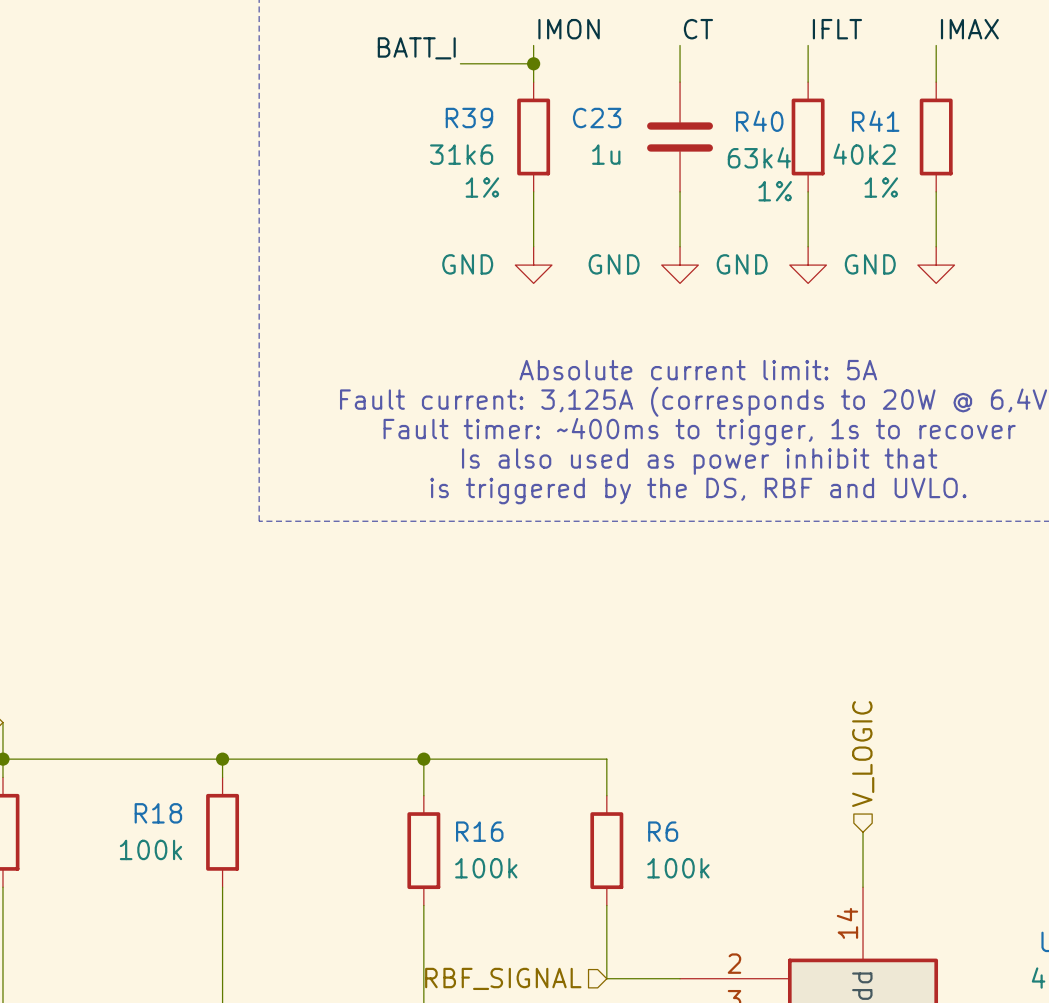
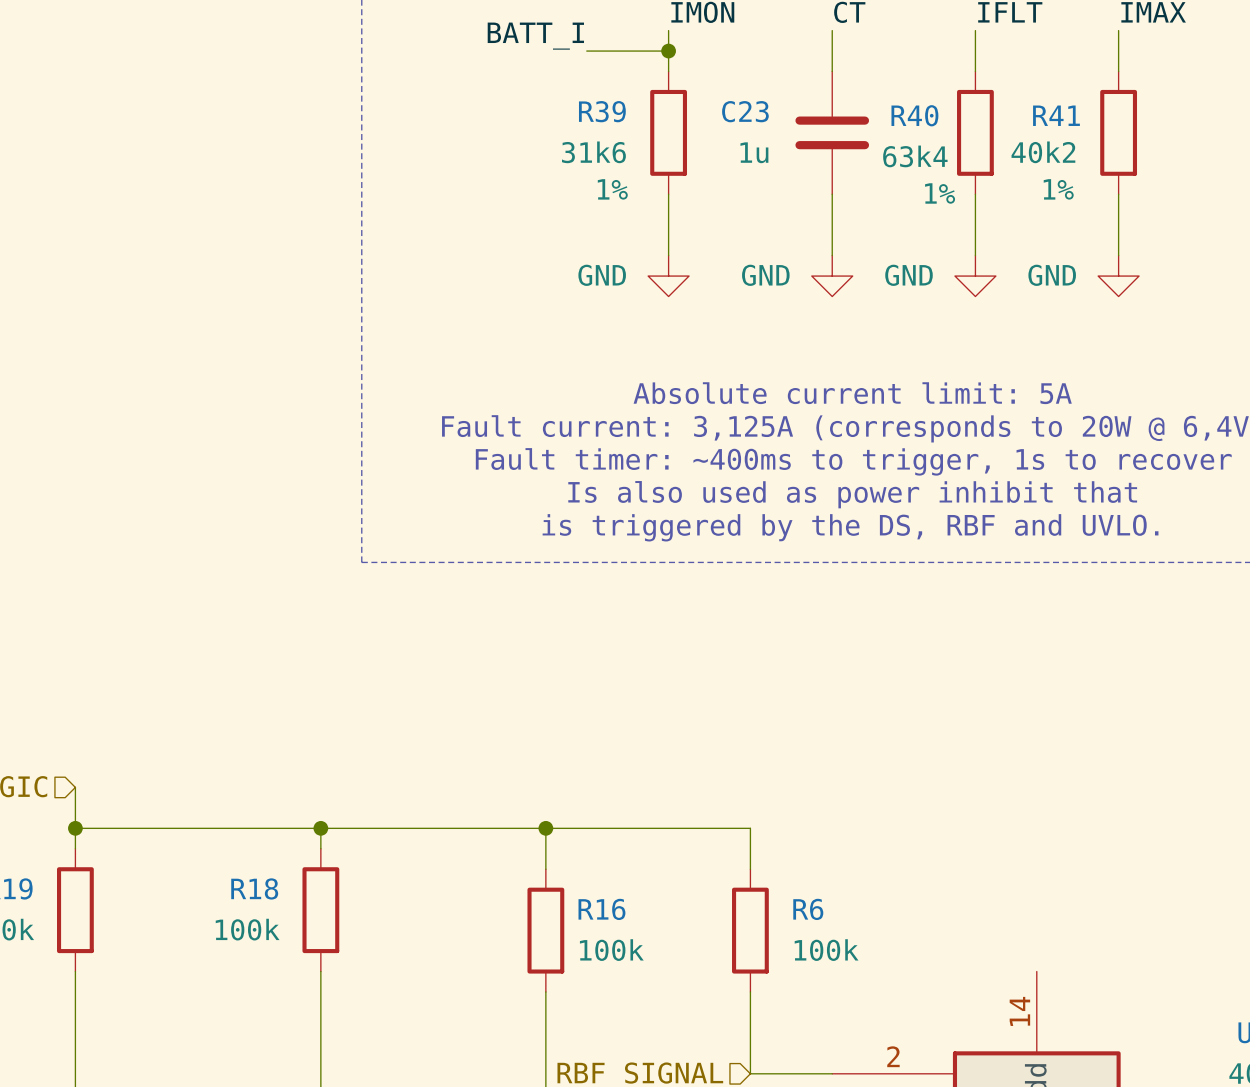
hierarchical label: V_LOGIC (863, 754) -> none
wire: (863, 832) (863, 887) -> none

